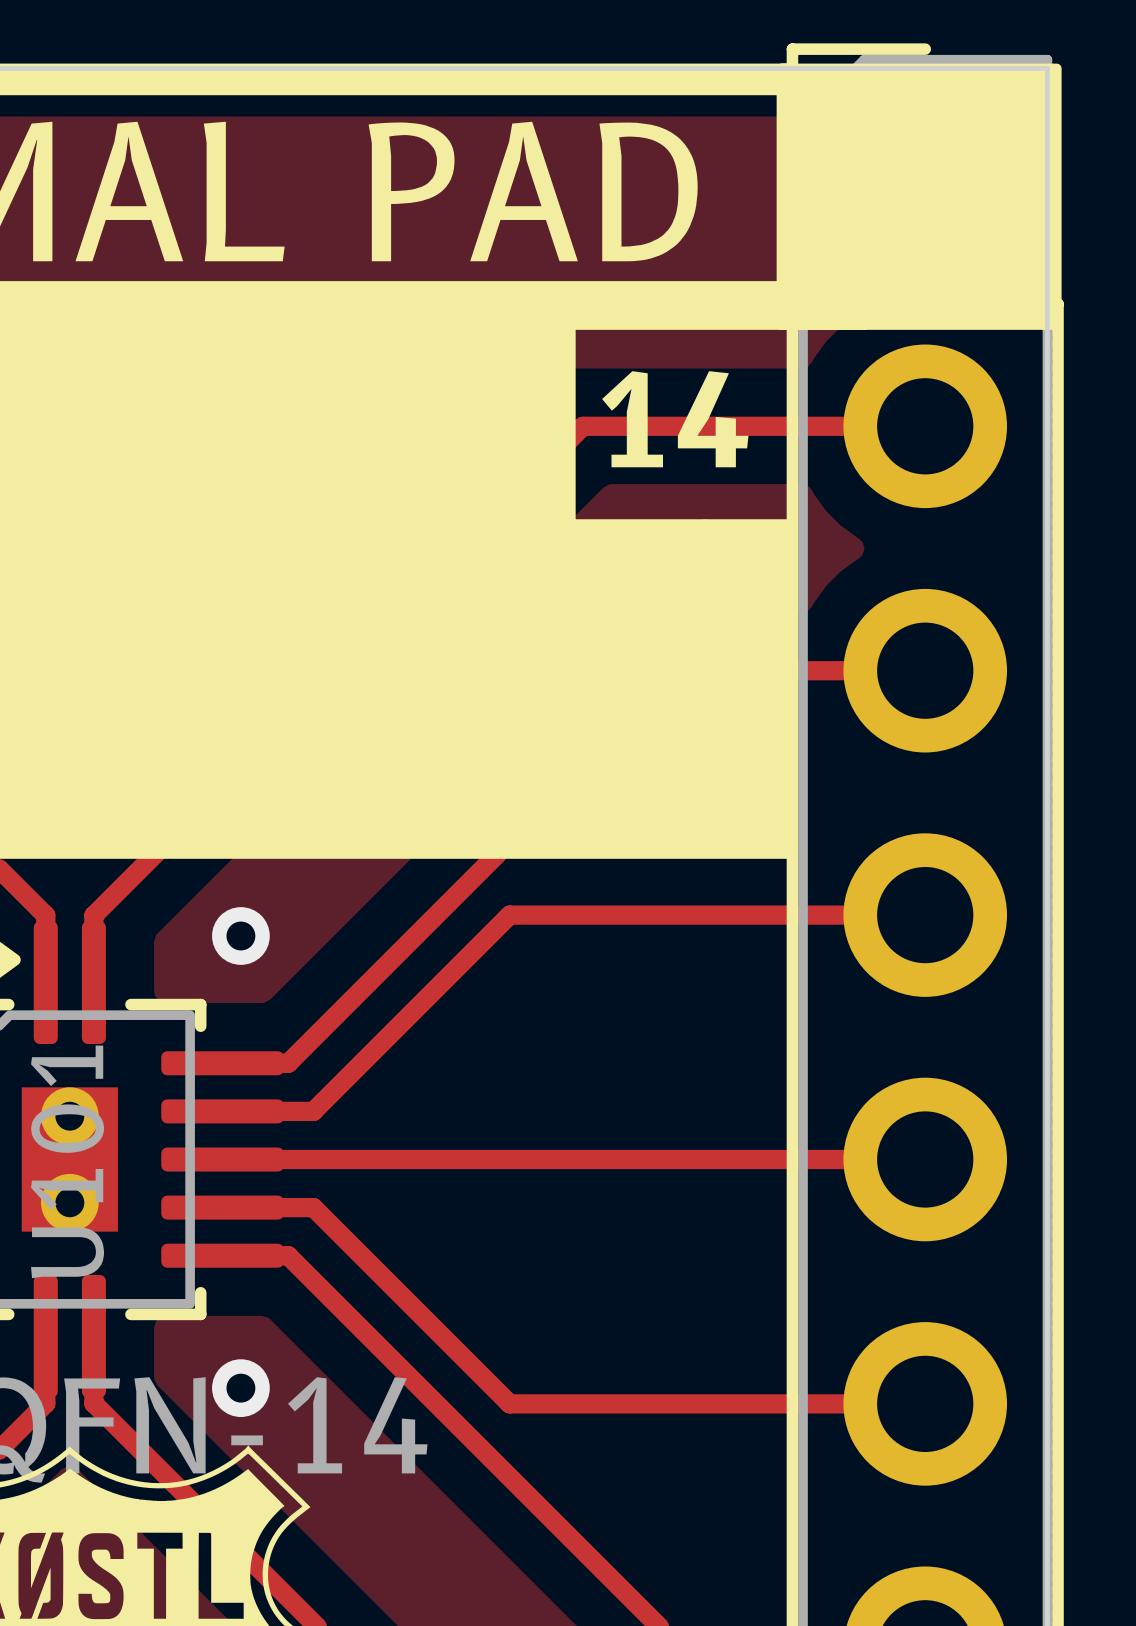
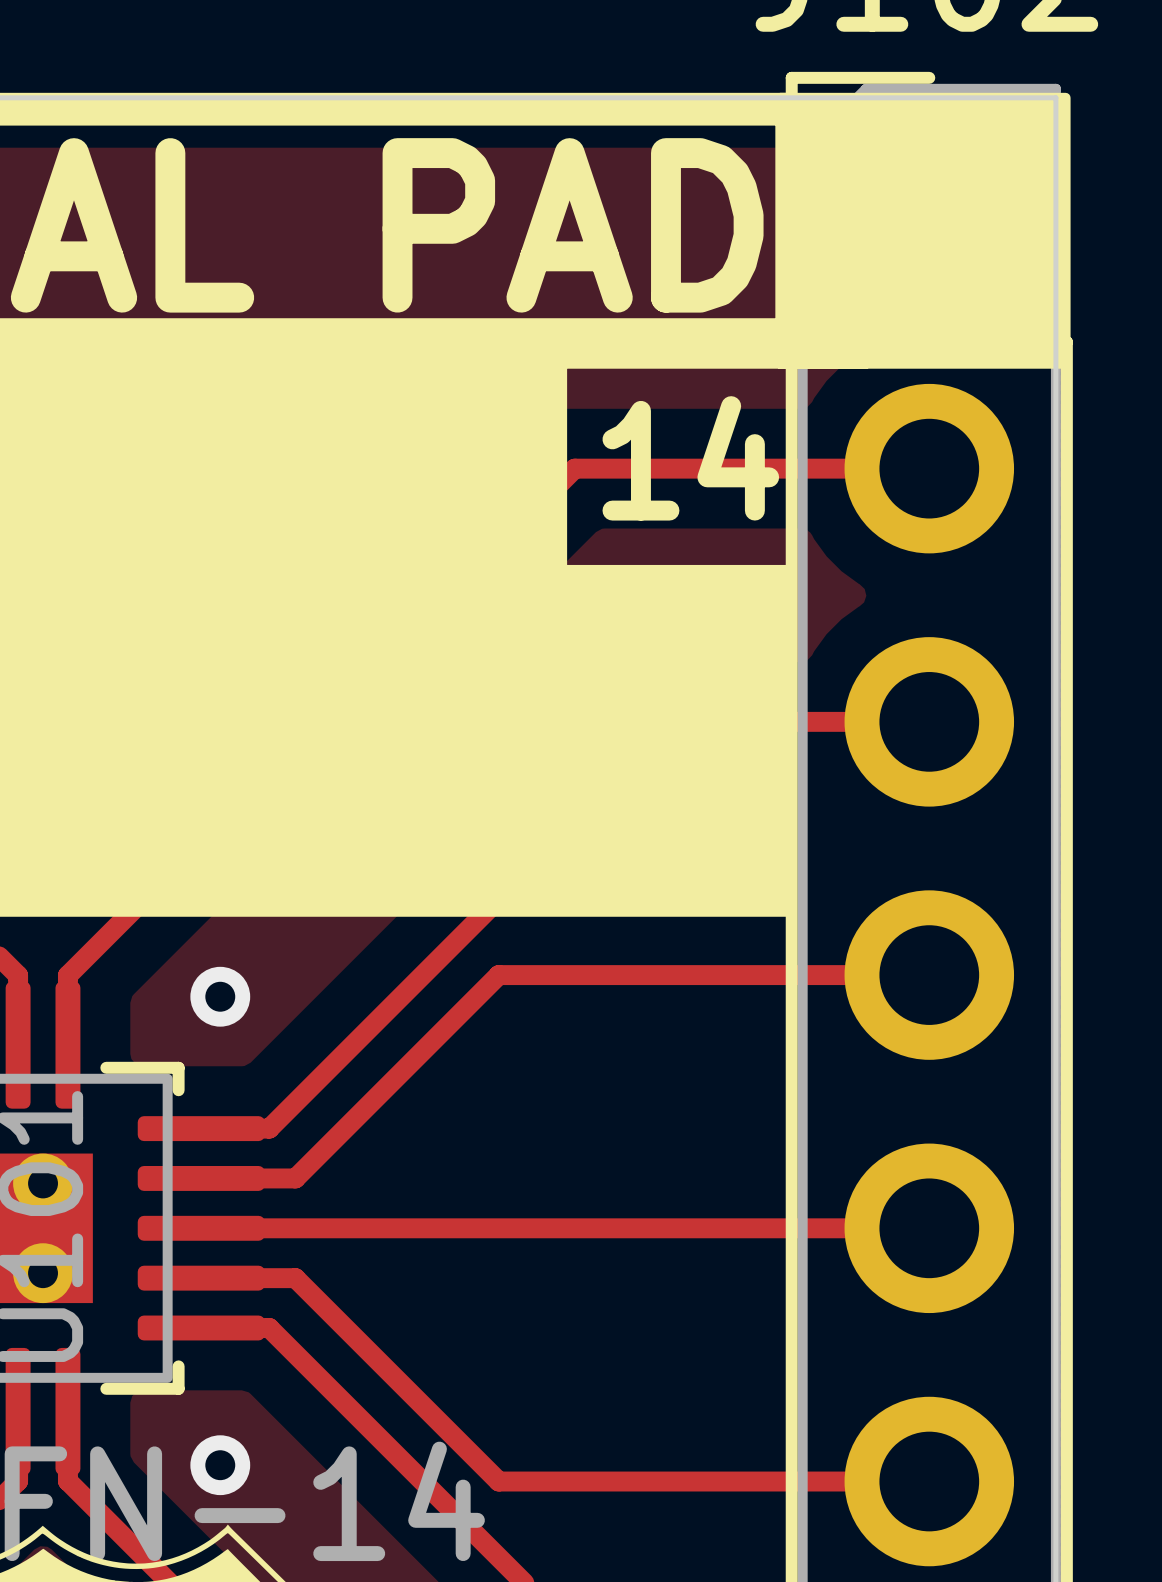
text position: 14 (675, 419) -> 14 (690, 458)

